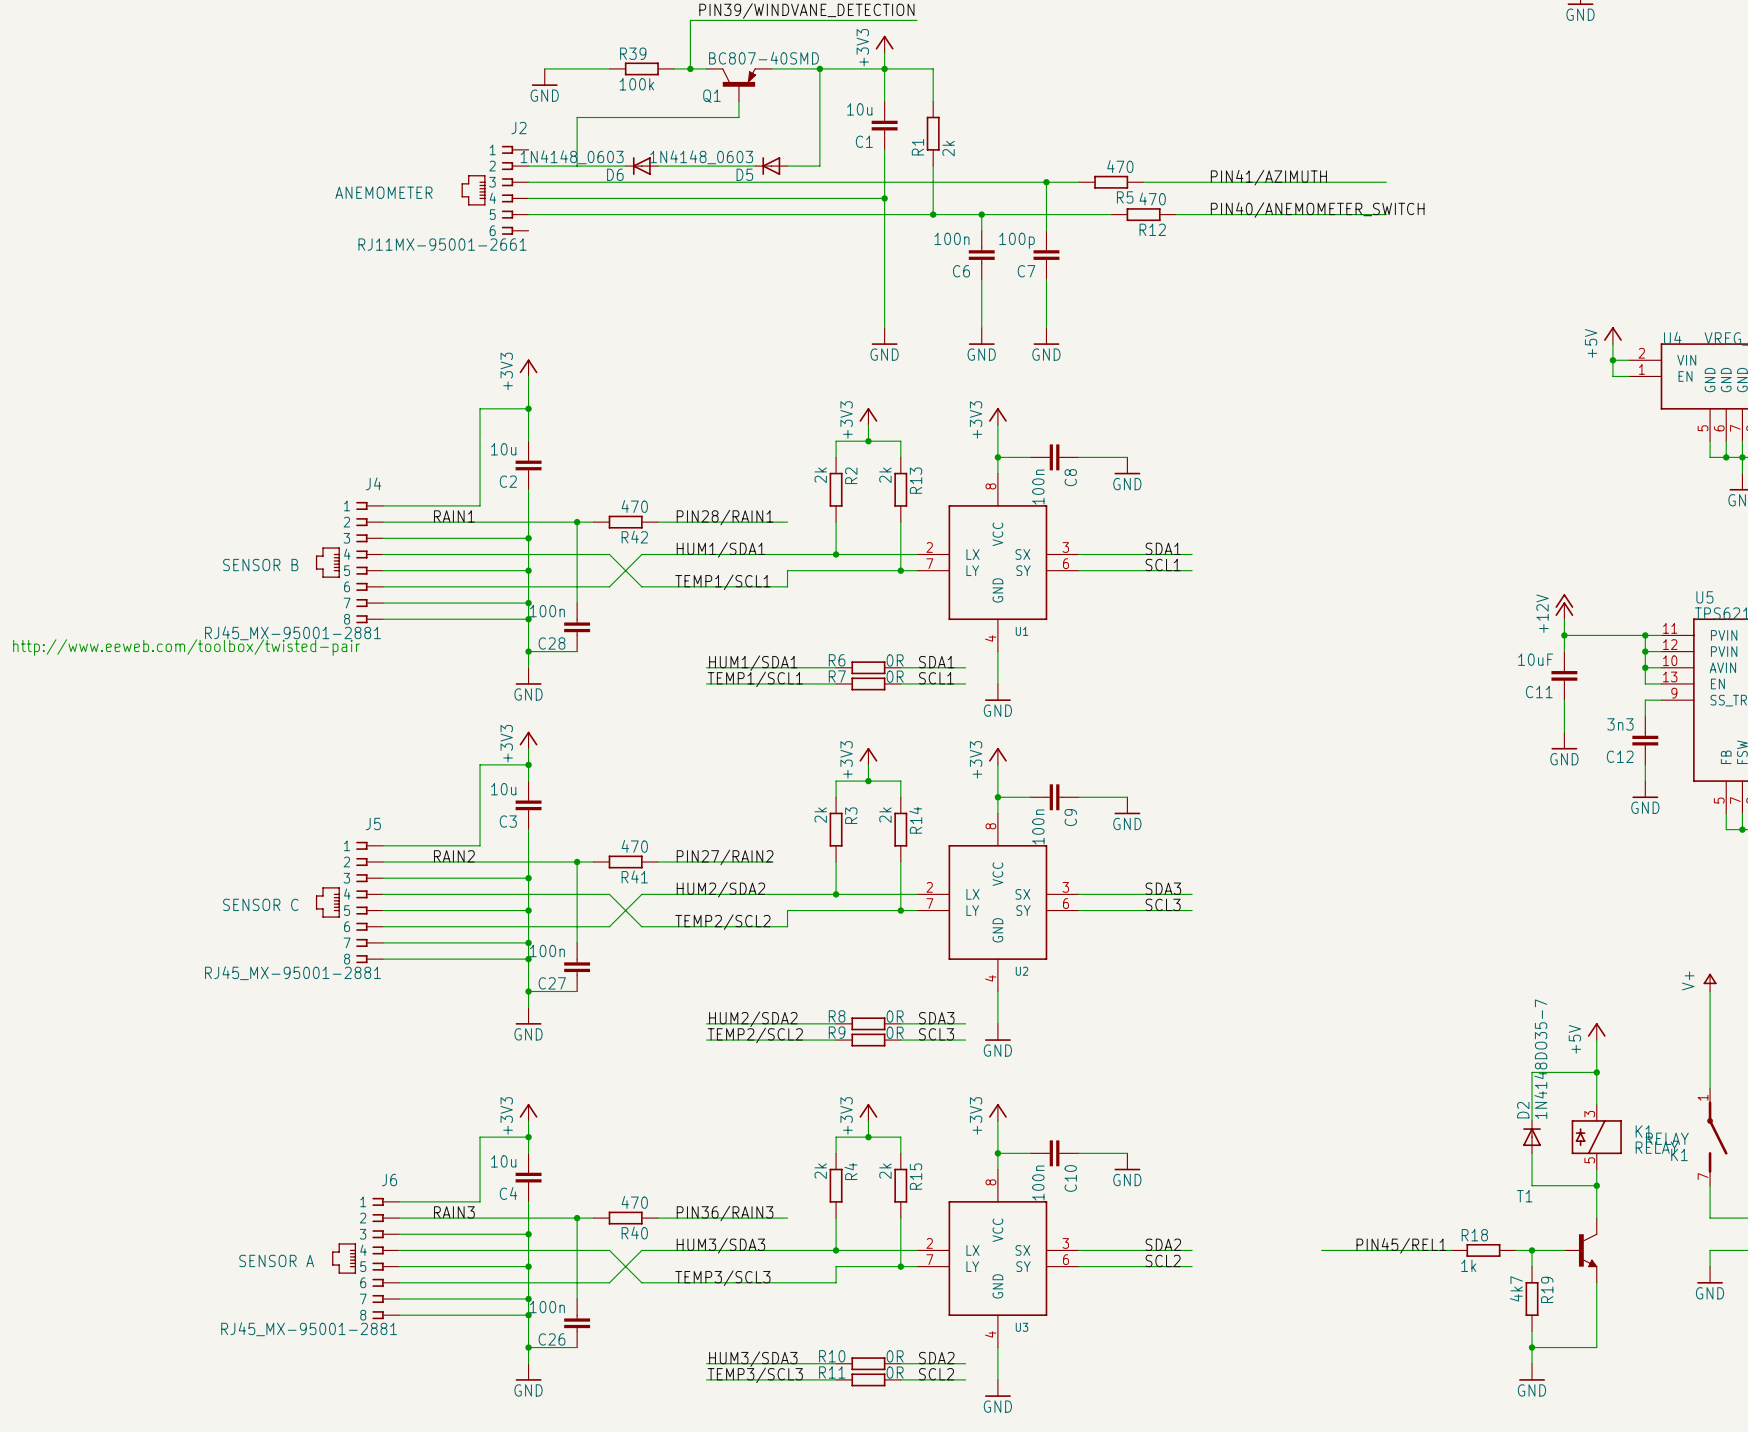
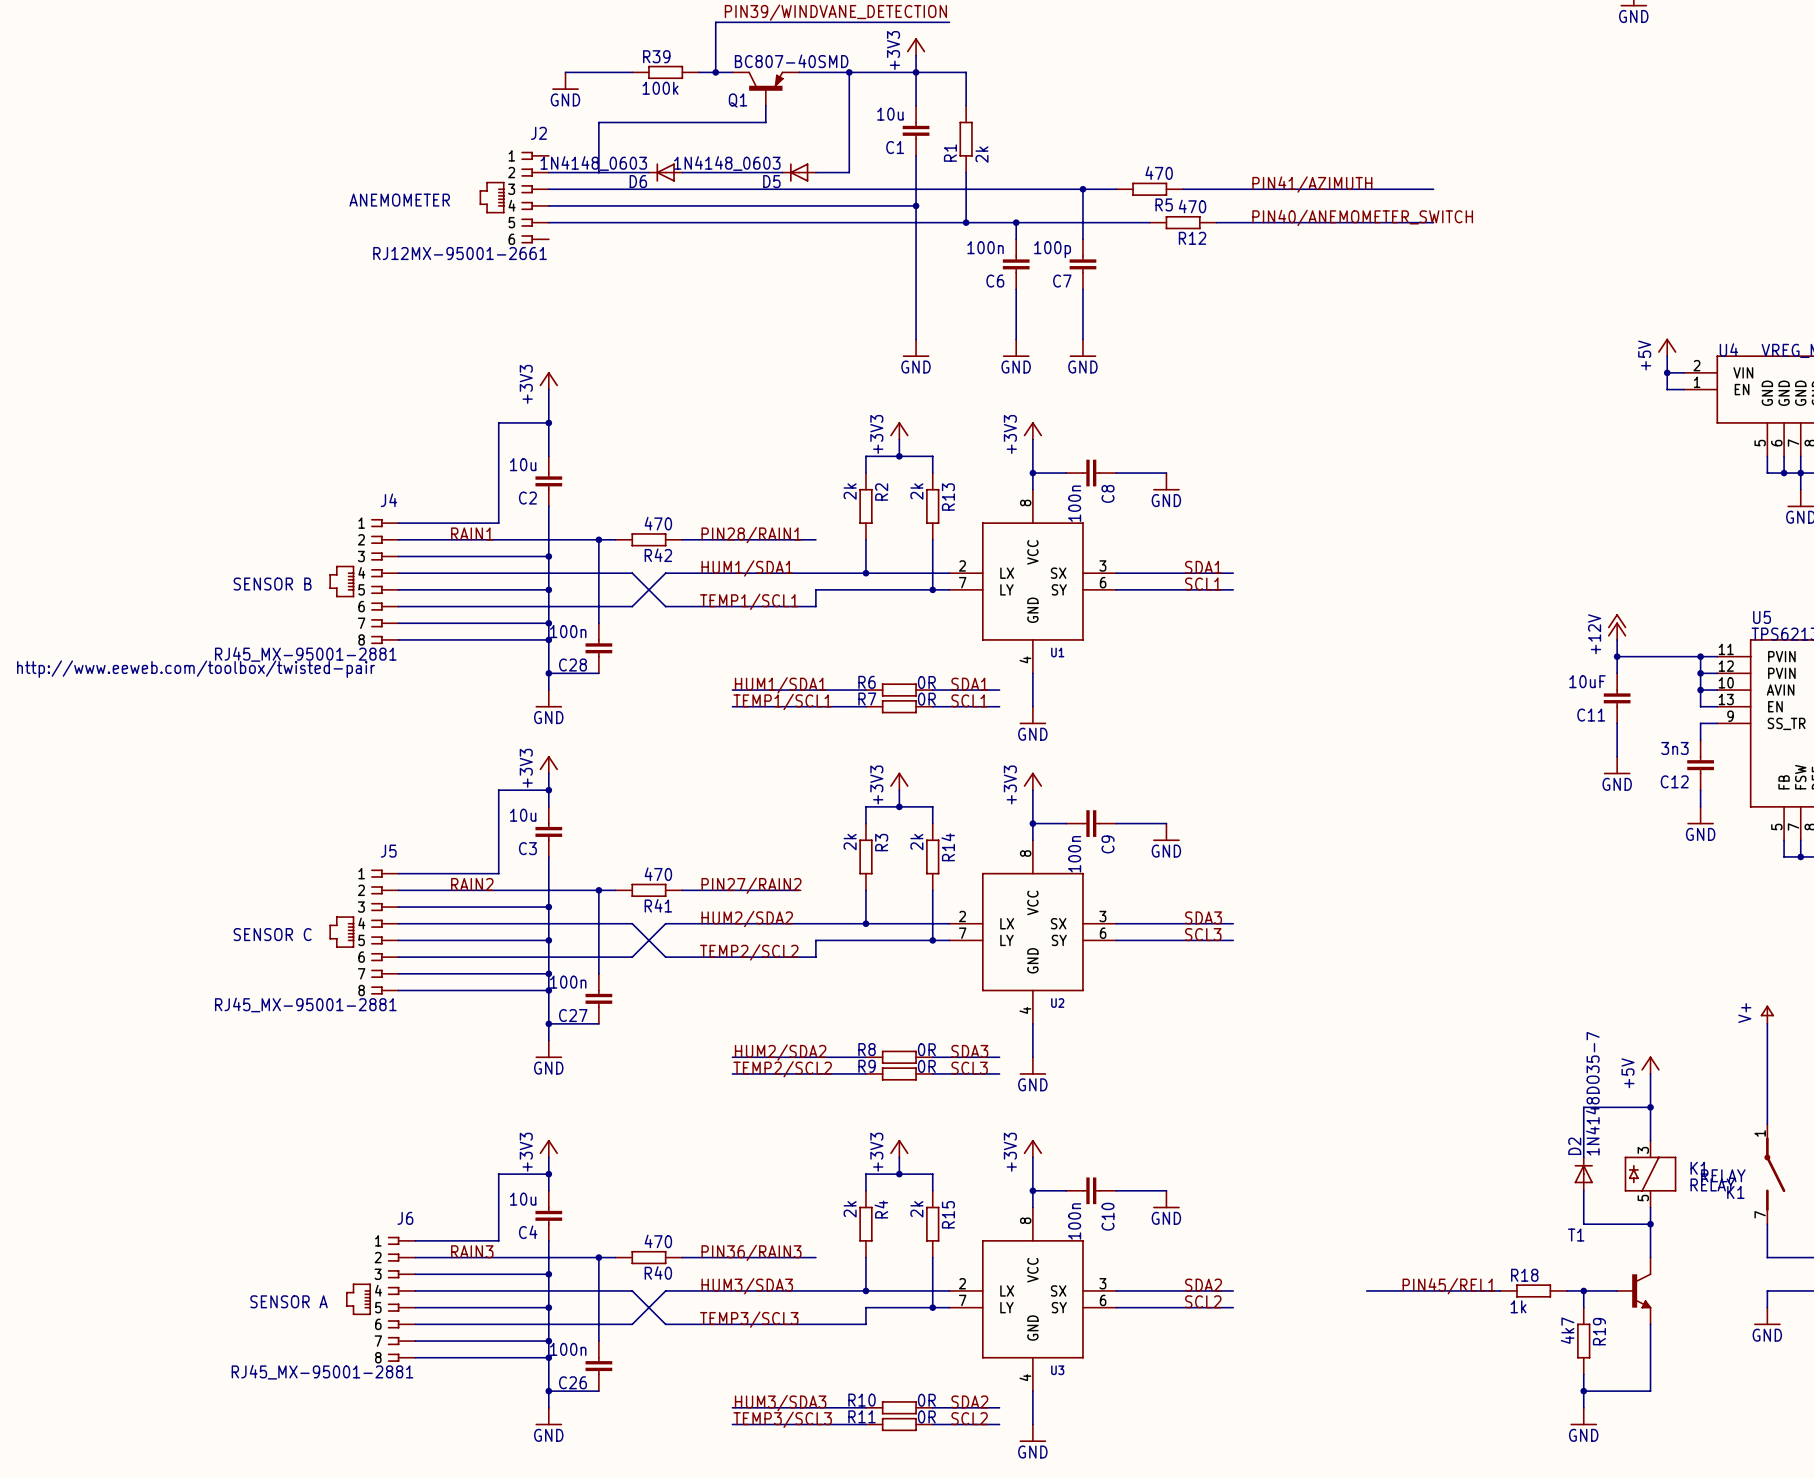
J2 value: RJ11MX-95001-2661 (442, 244) -> RJ12MX-95001-2661 (460, 253)

